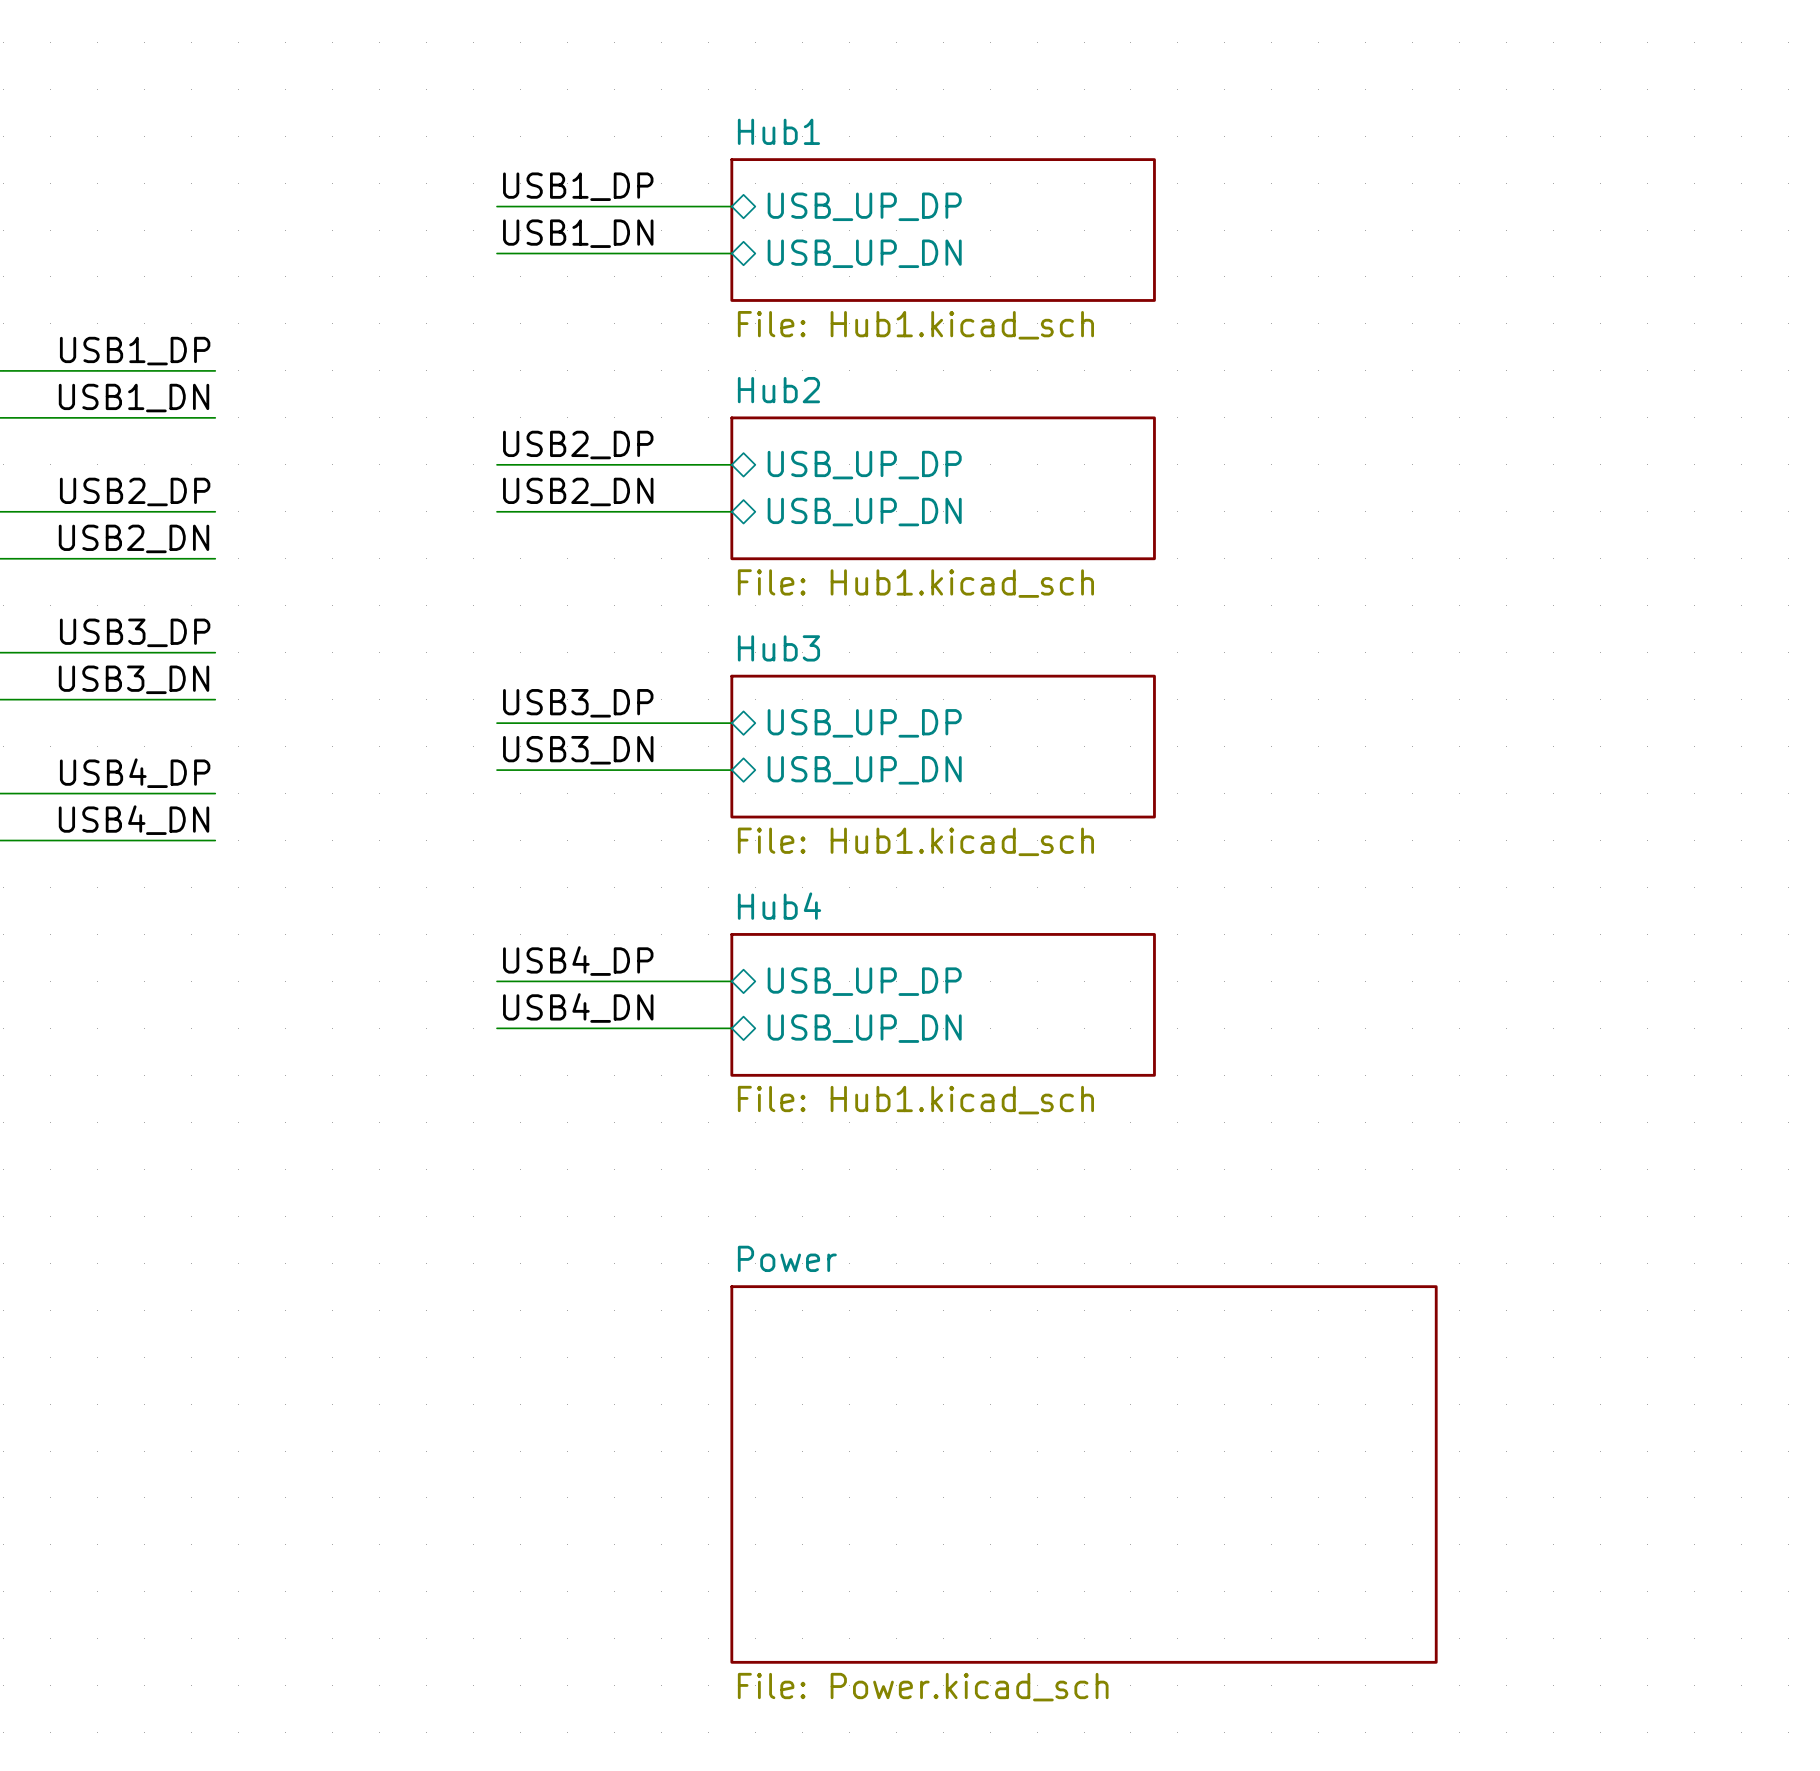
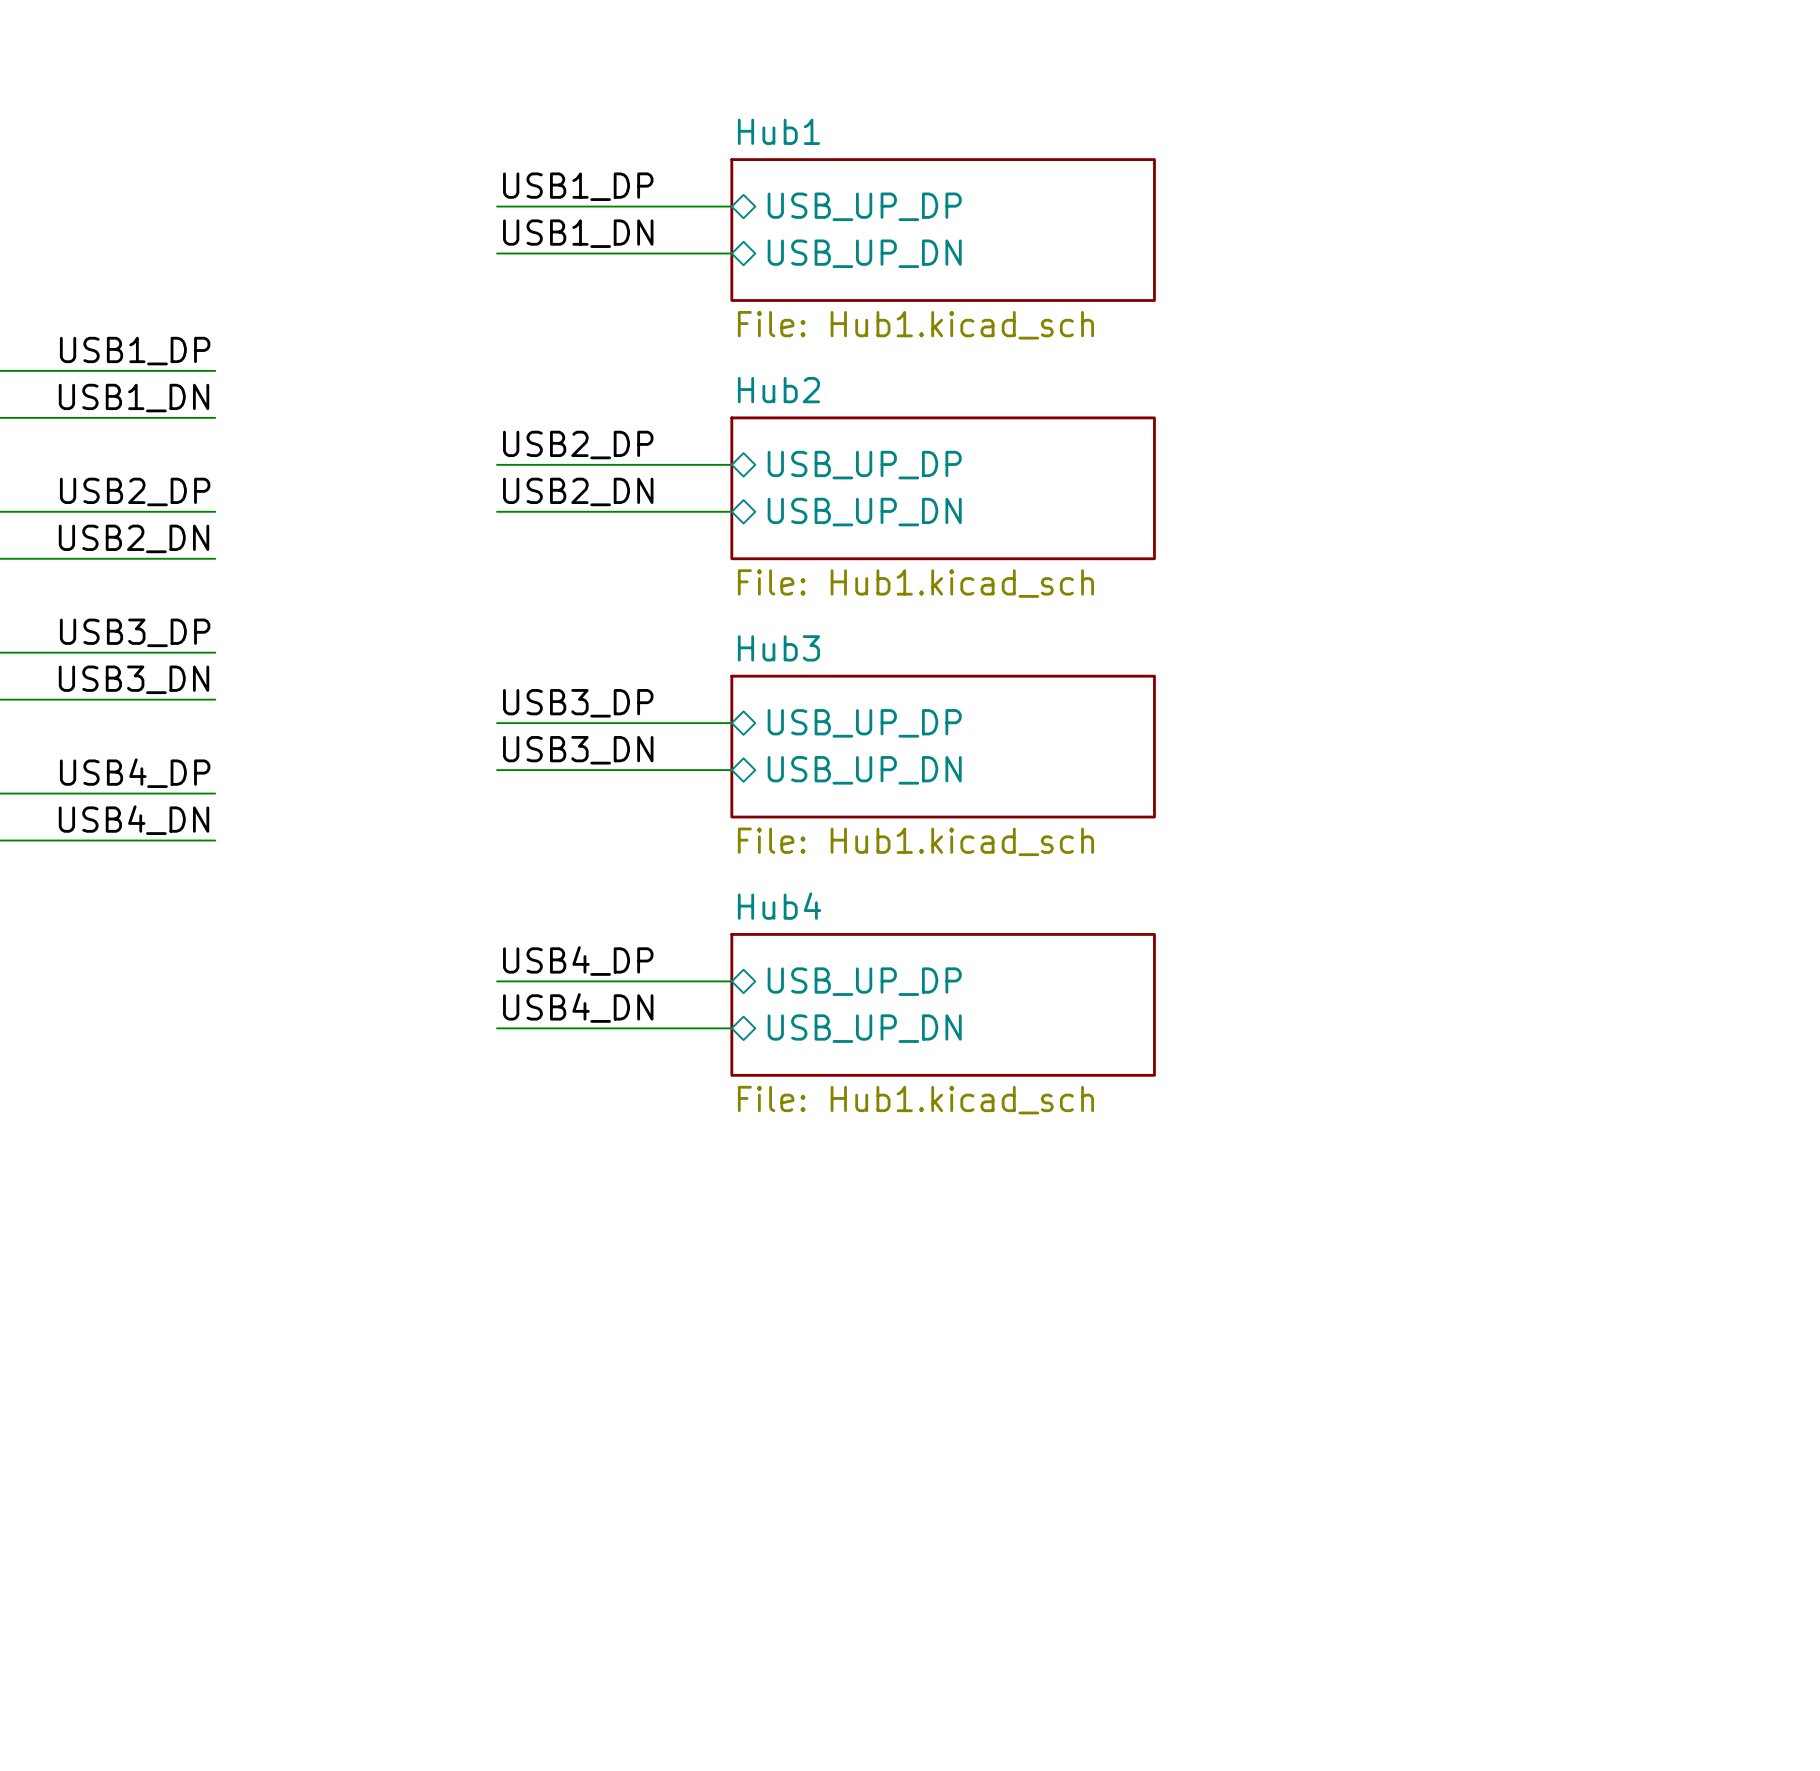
sheet Power: File: Power.kicad_sch (1084, 1474) -> none

